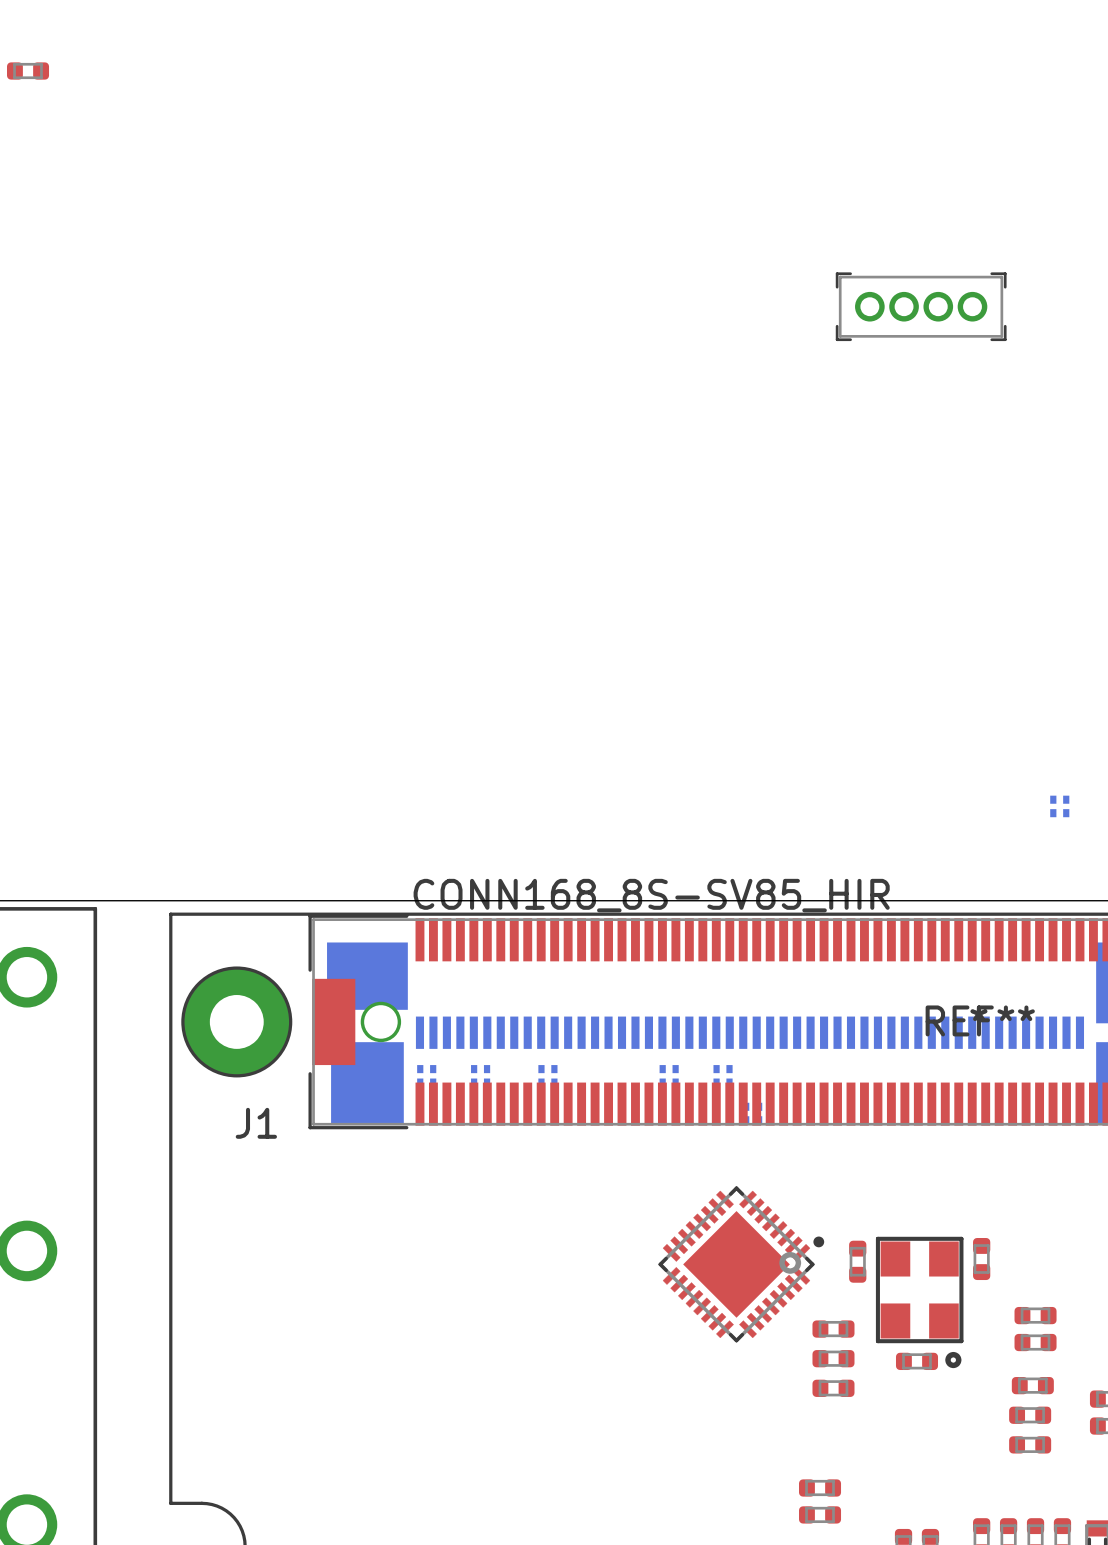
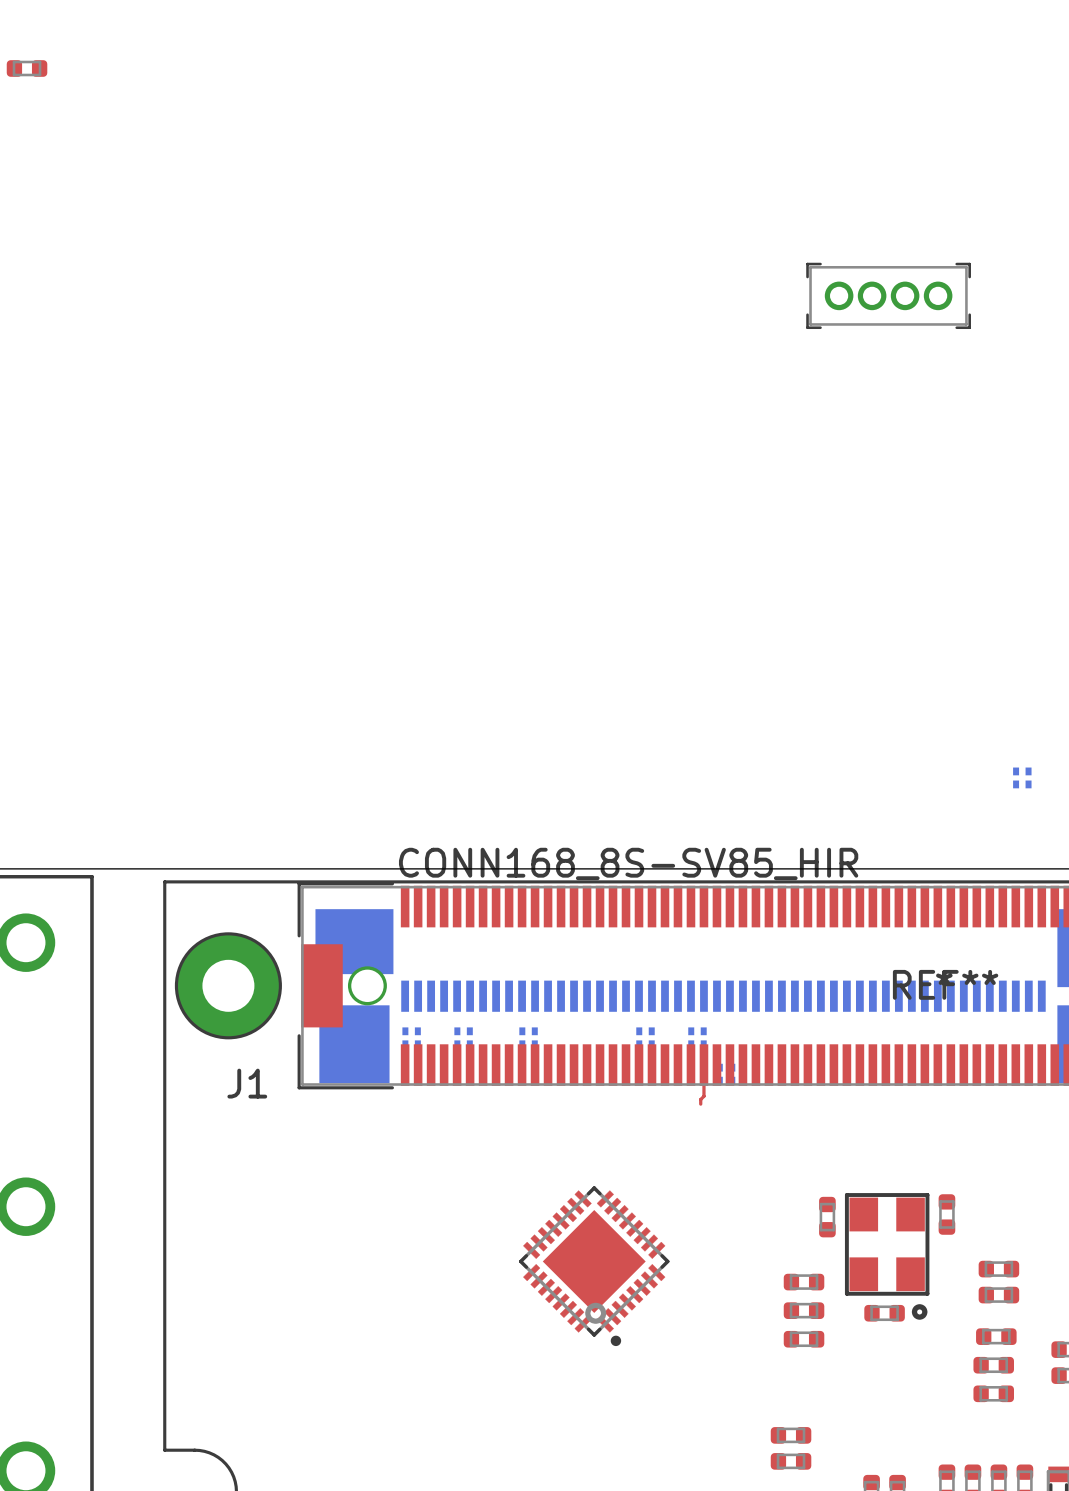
top track: none -> (703, 1065) (703, 1096) (700, 1099) (700, 1104)
part rotation: 0° (741, 1264) -> 90° clockwise (594, 1266)
part position: (741, 1264) -> (594, 1266)

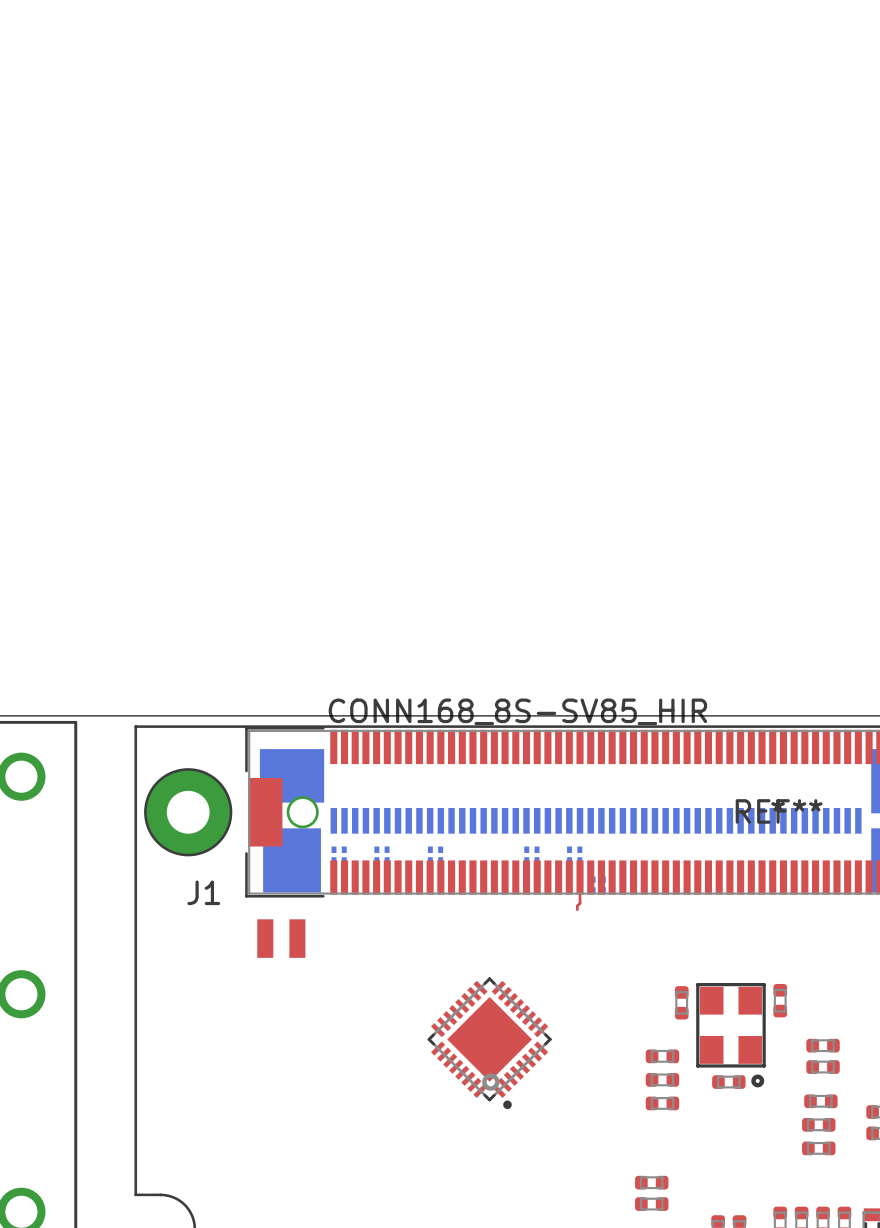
part: (27, 68) -> none
part: (888, 295) -> none
part: (1022, 777) -> none
part: none -> (281, 938)

